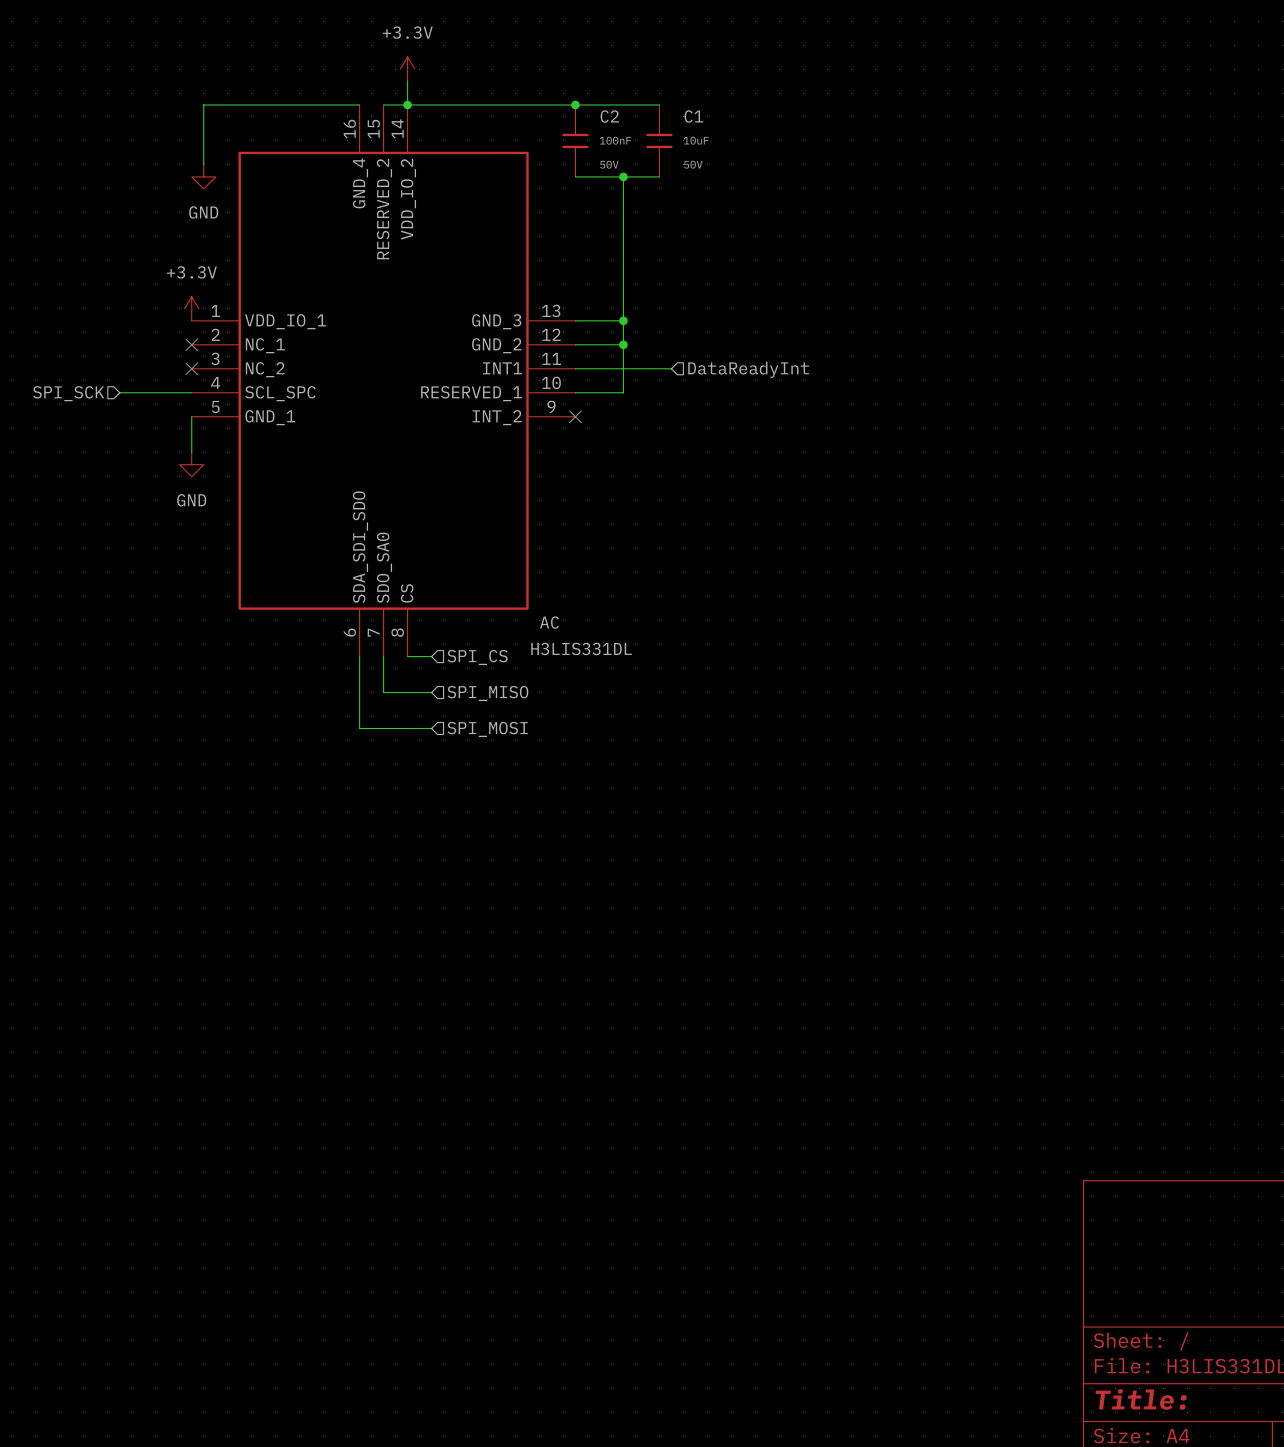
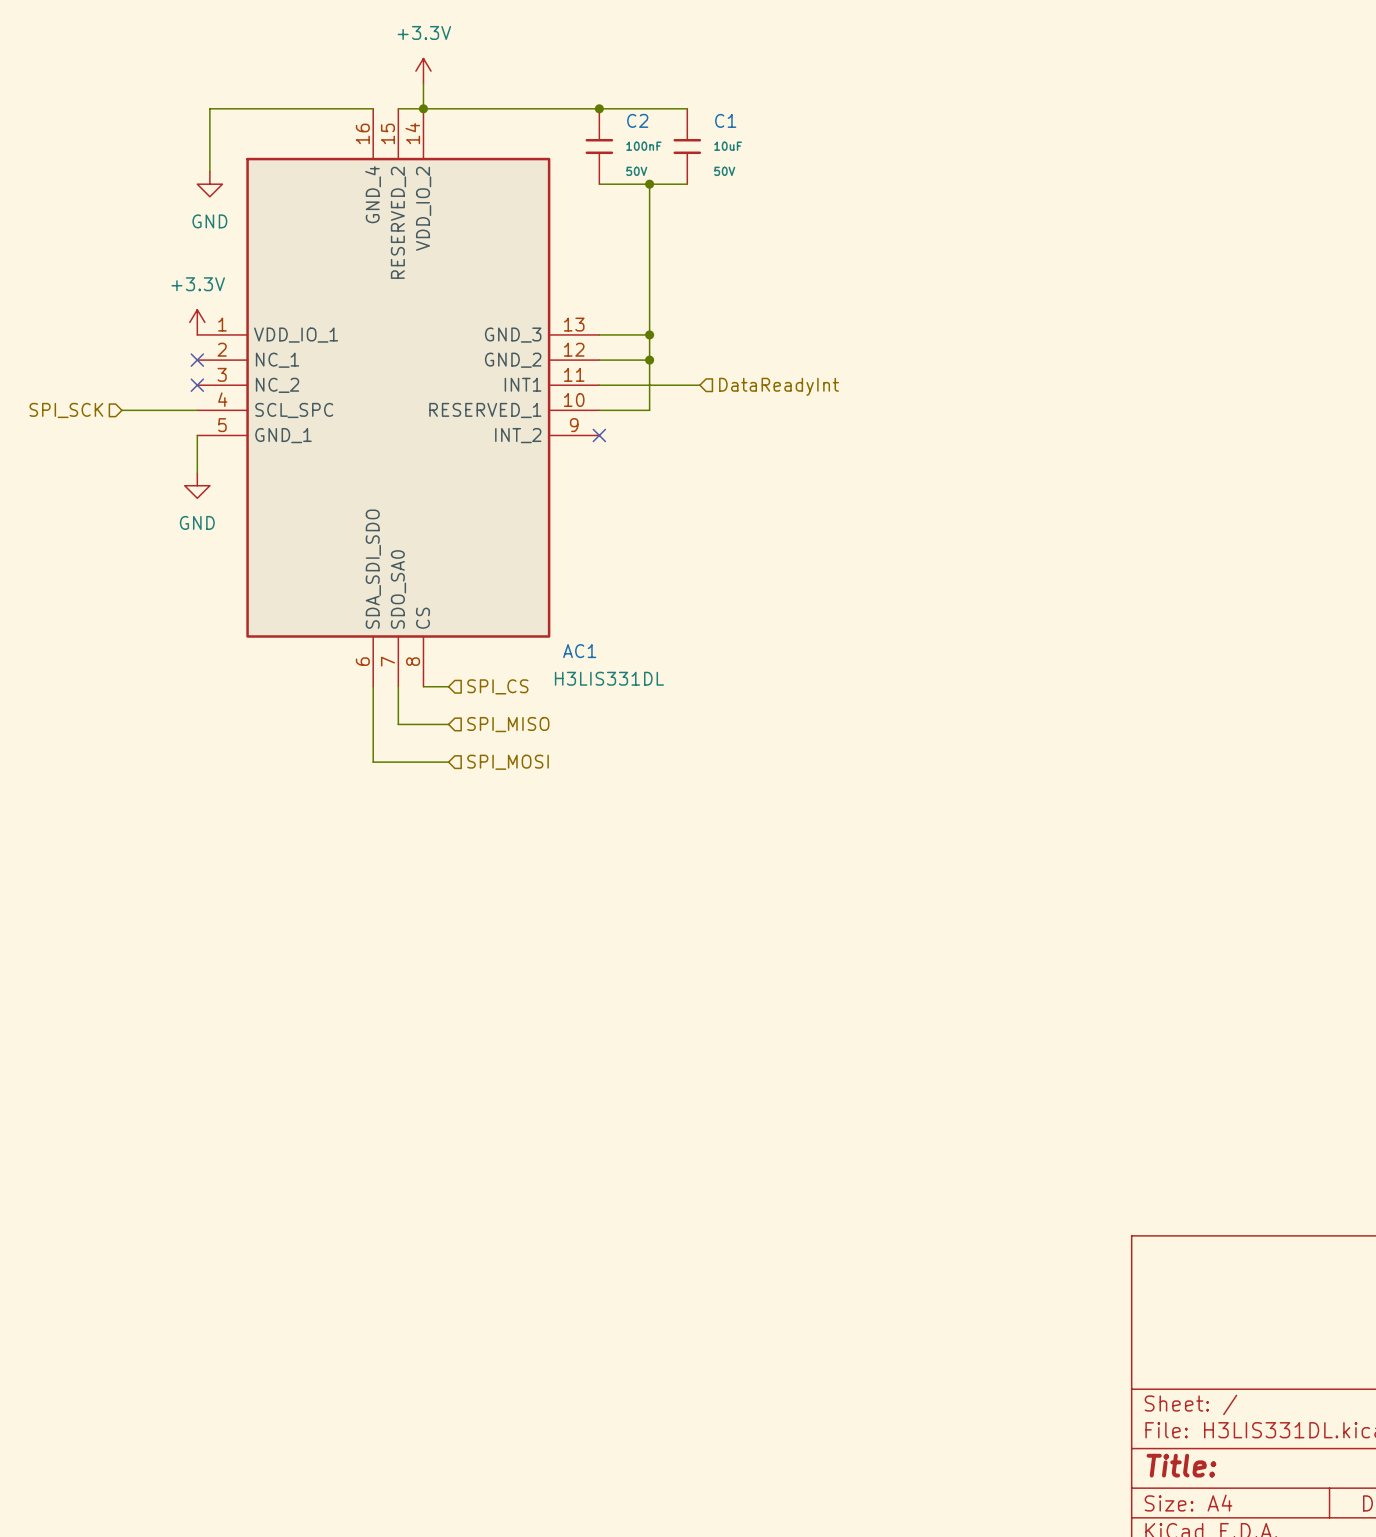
AC name: AC (549, 622) -> AC1 (579, 651)

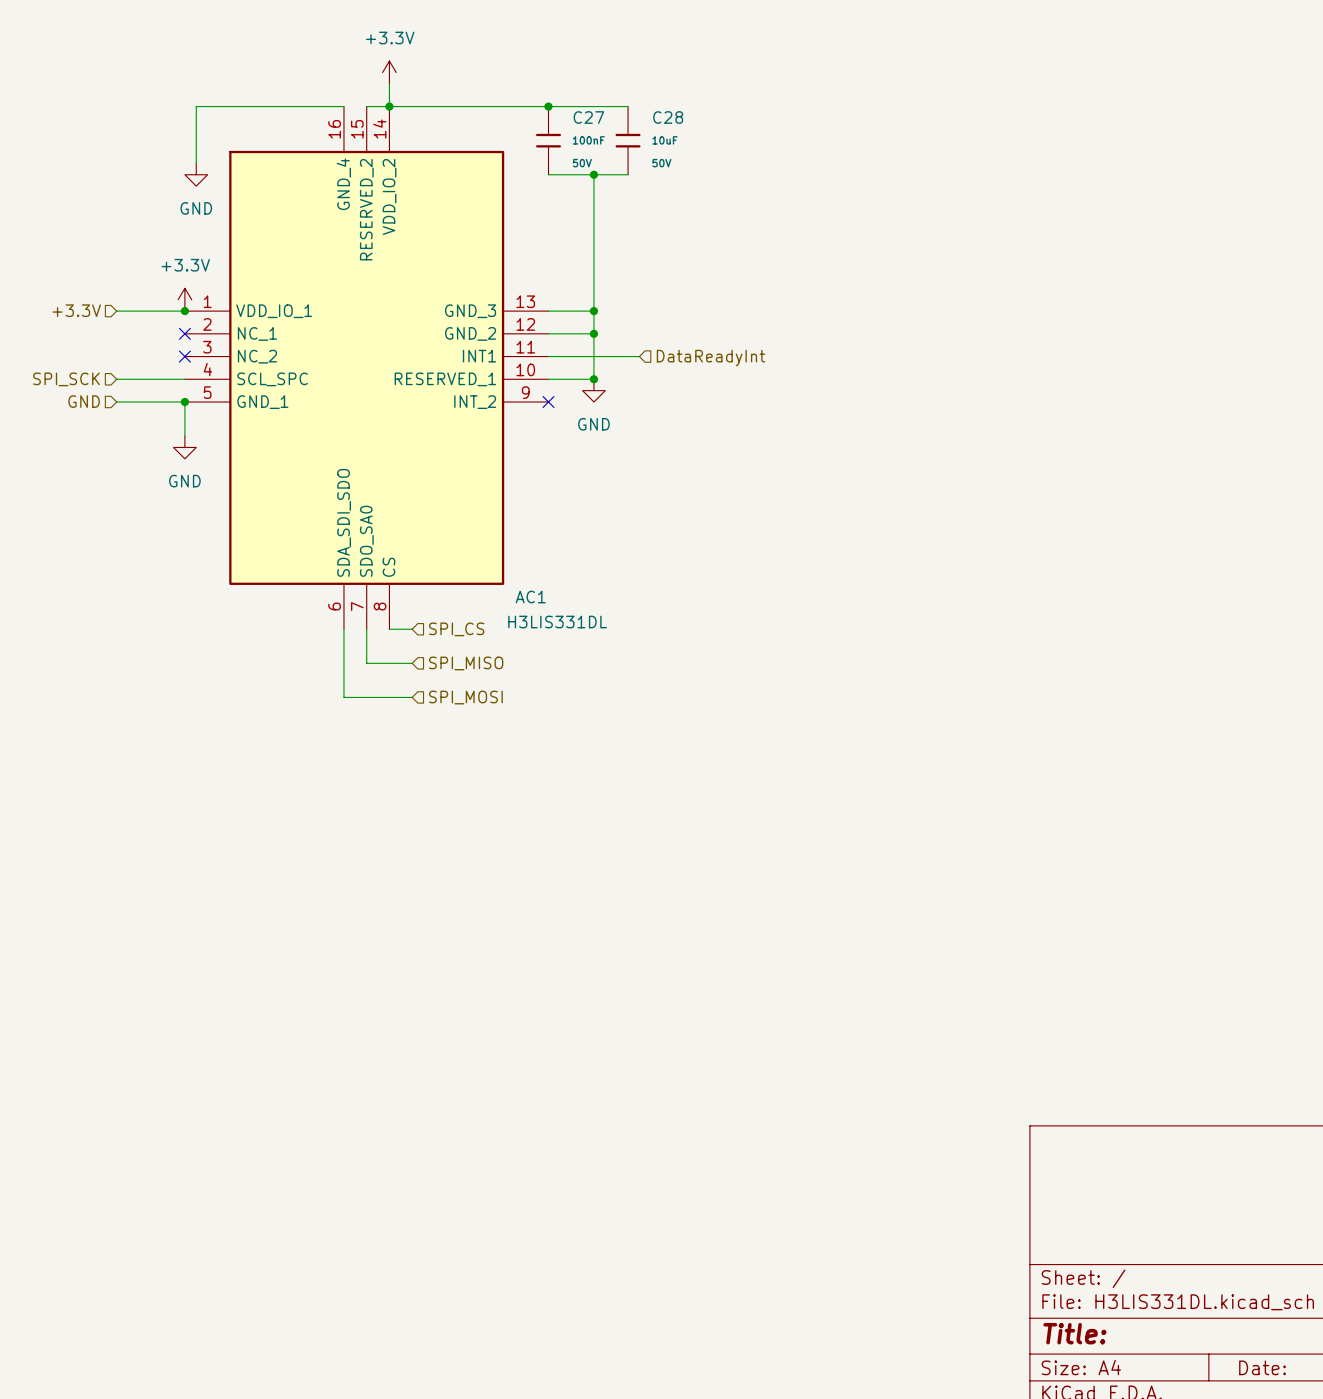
C2 name: C2 (637, 120) -> C27 (588, 117)
C1 name: C1 (725, 120) -> C28 (668, 117)
hierarchical label: none -> +3.3V (76, 310)
wire: none -> (116, 311) (184, 311)
junction: none -> (184, 311)
junction: none -> (593, 379)
power symbol: none -> GND (593, 390)
hierarchical label: none -> GND (84, 401)
wire: none -> (116, 402) (184, 402)
junction: none -> (184, 402)

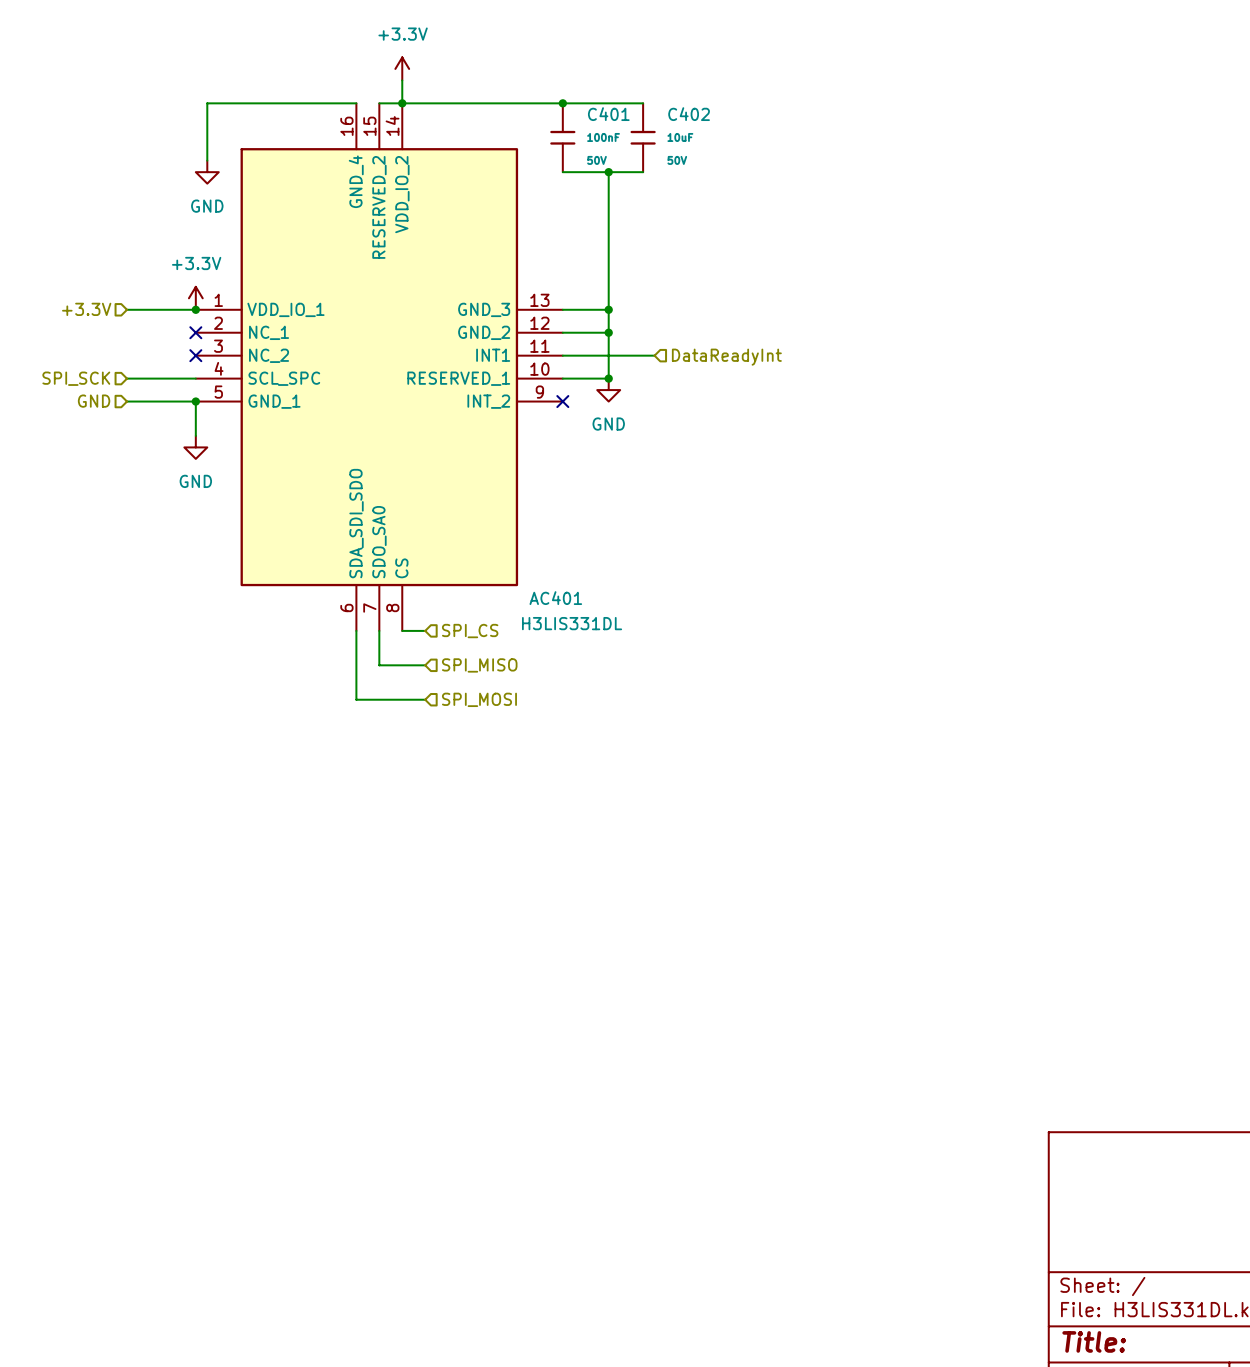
C27 name: C27 (588, 117) -> C401 (608, 114)
C28 name: C28 (668, 117) -> C402 (689, 114)
AC1 name: AC1 (530, 597) -> AC401 (555, 598)

